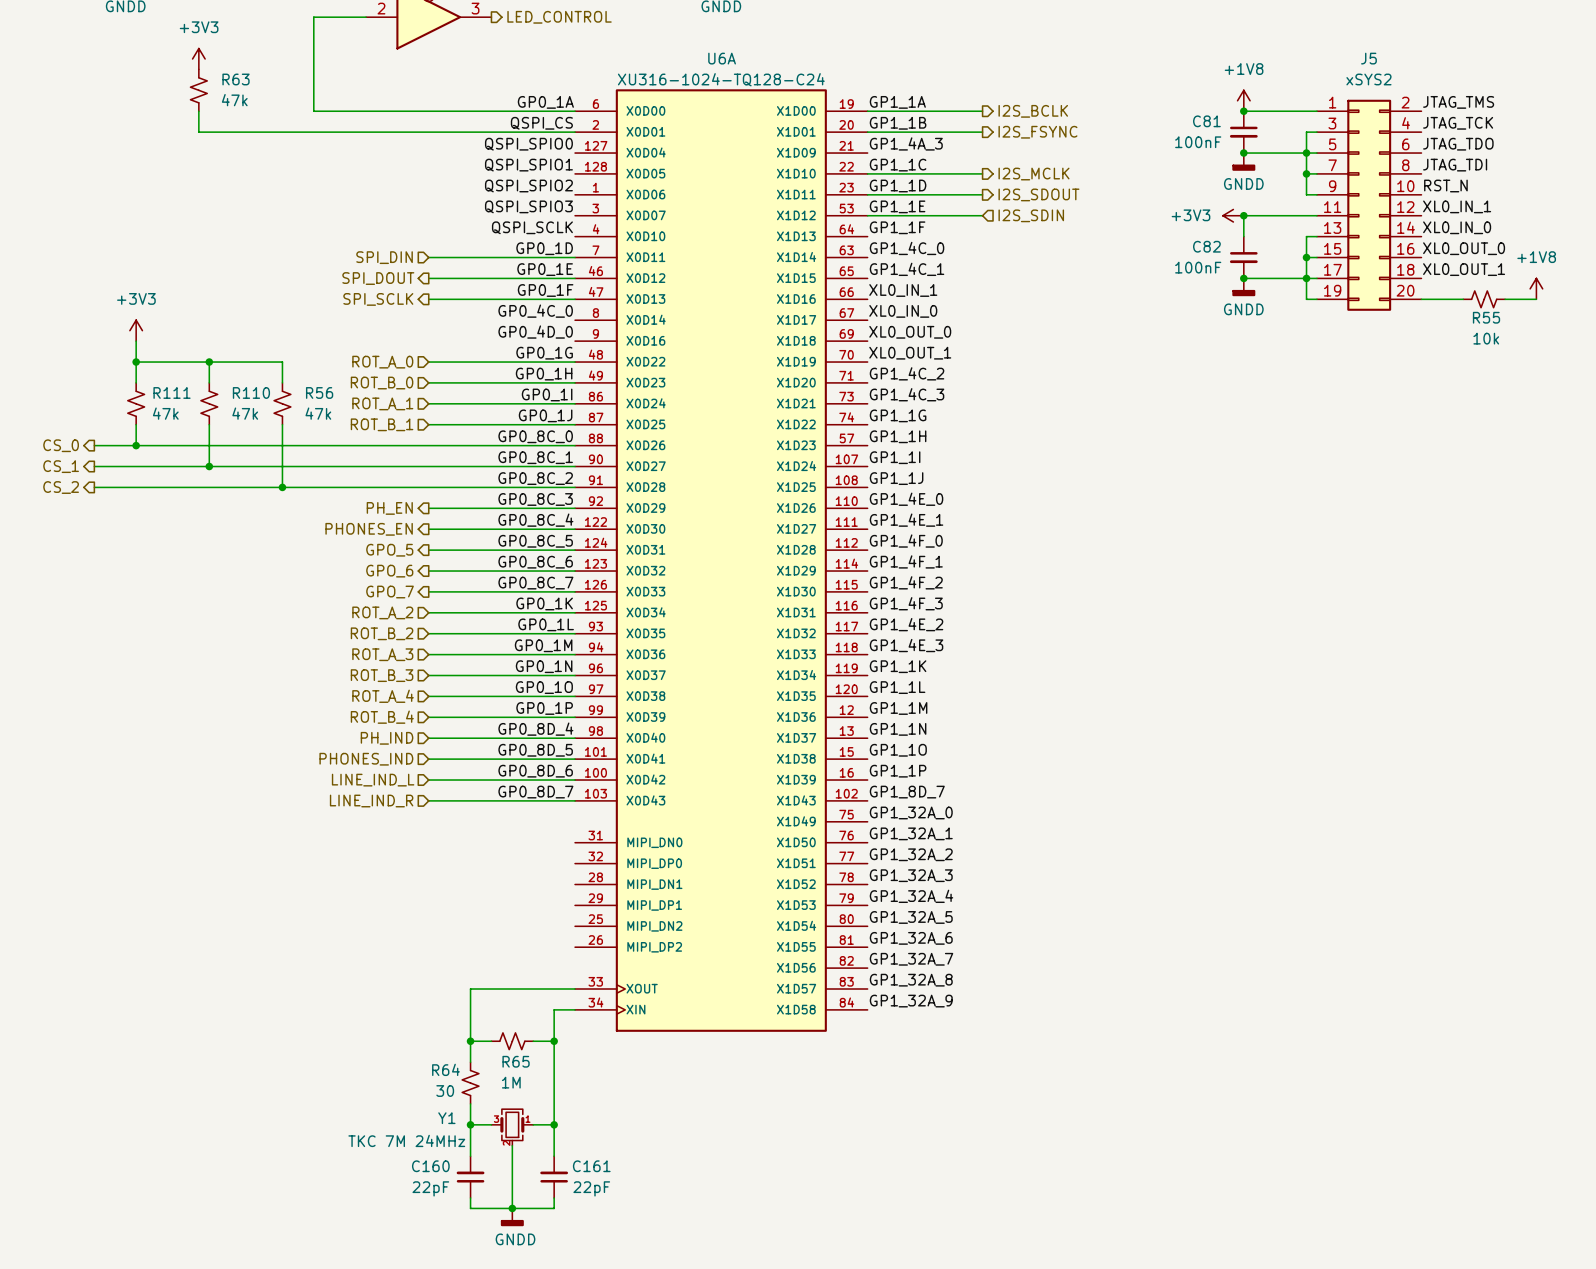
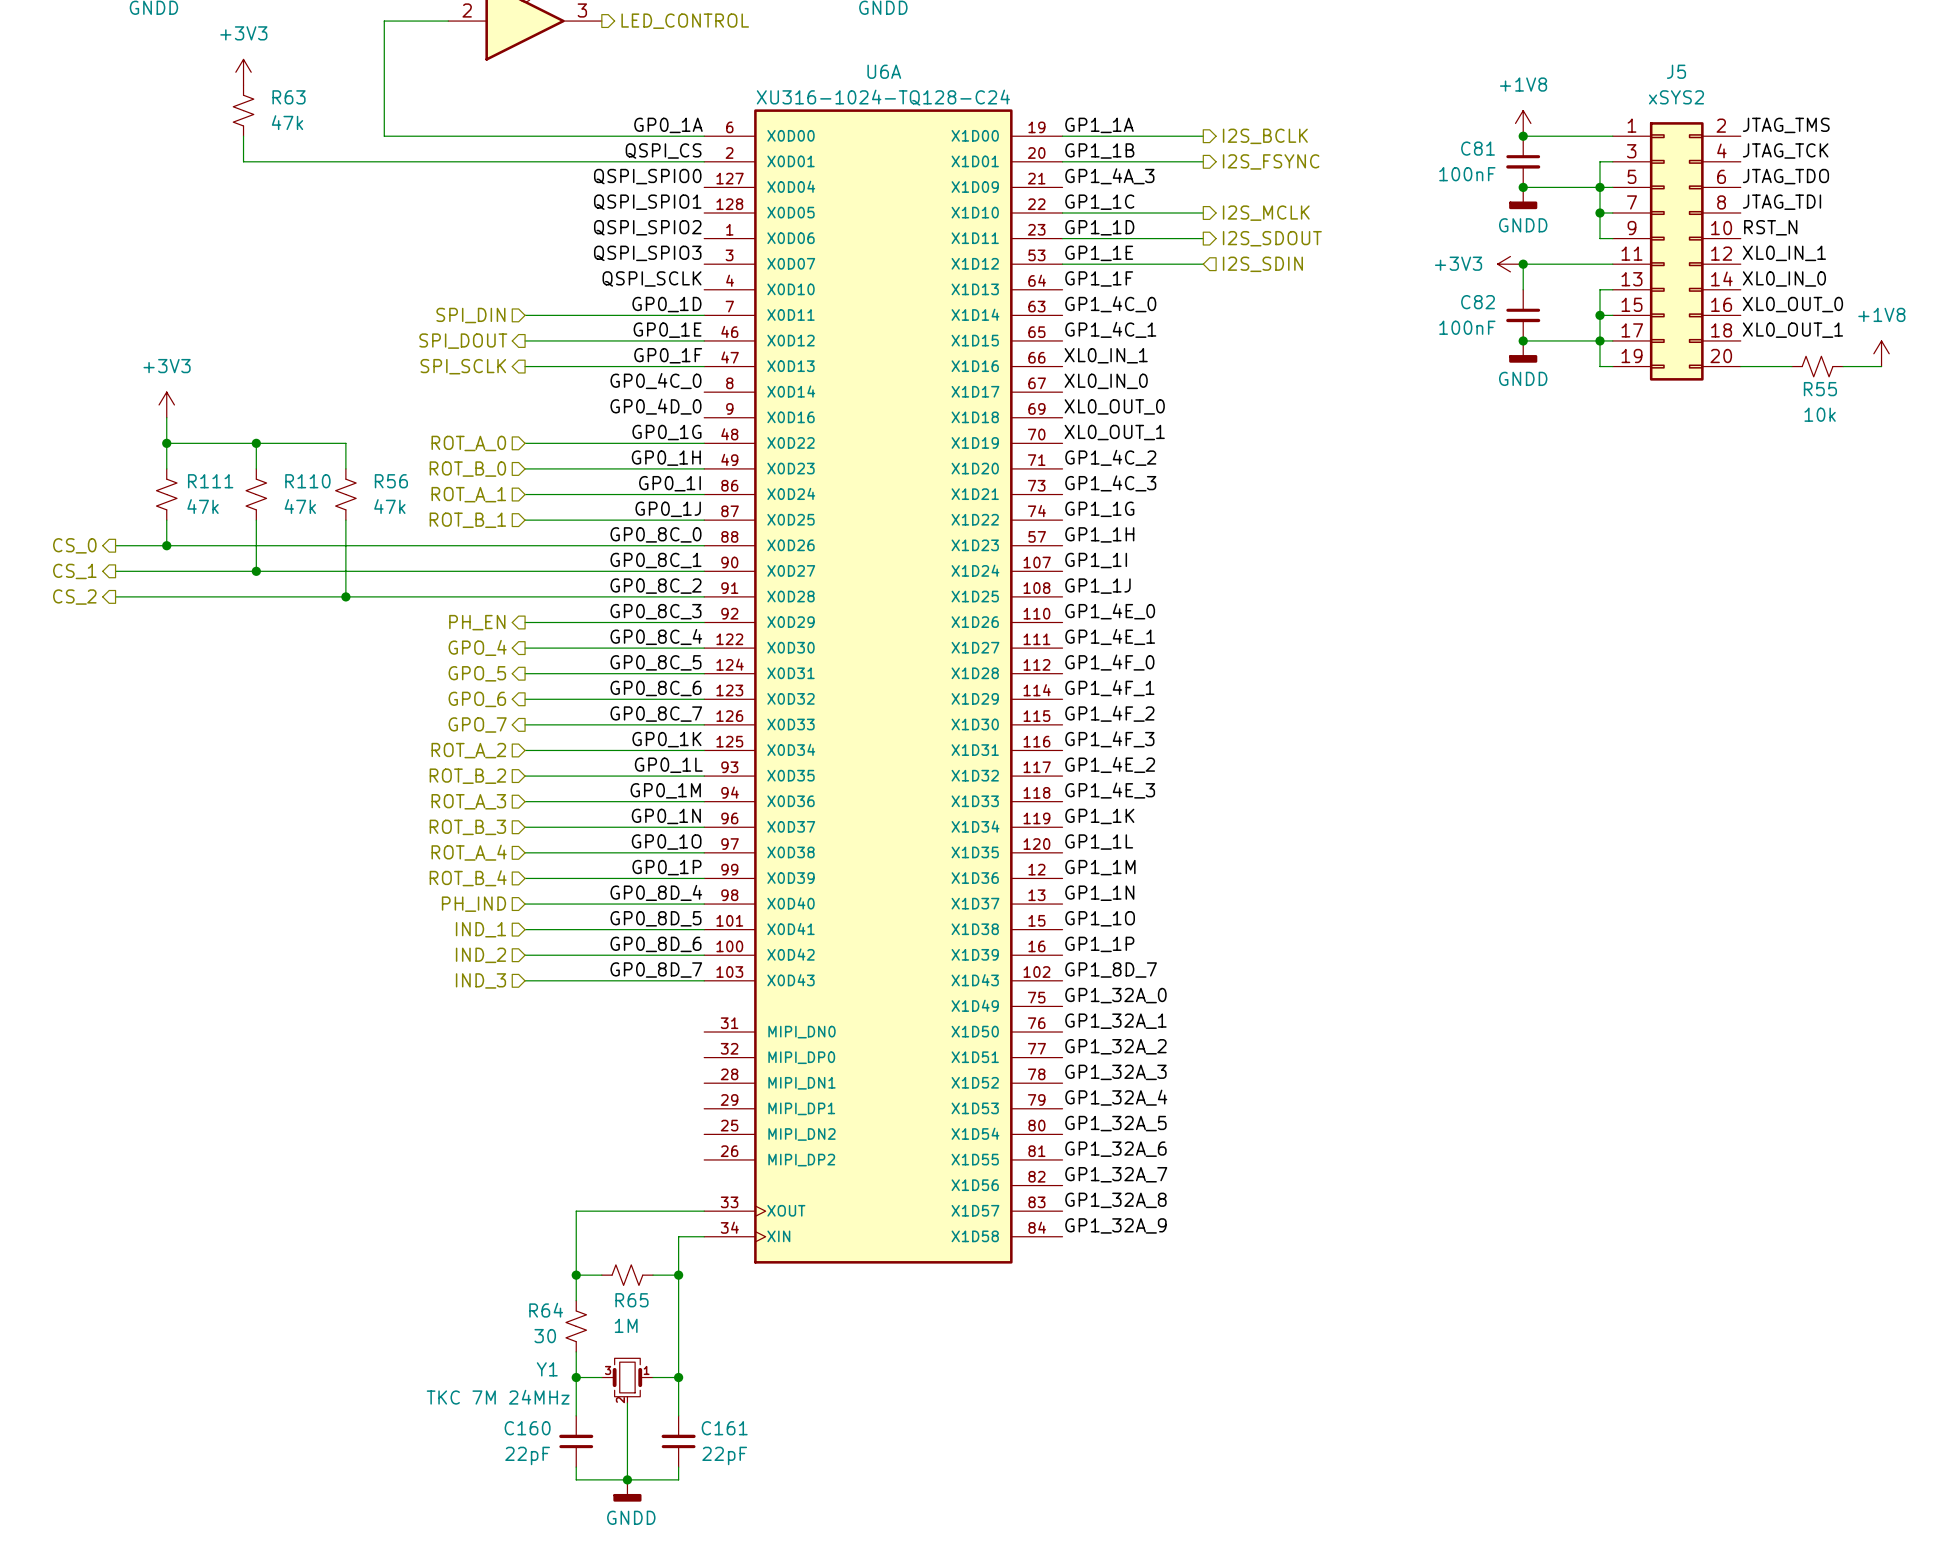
hierarchical label: PHONES_EN (369, 529) -> GPO_4 (477, 647)
hierarchical label: PHONES_IND (366, 759) -> IND_1 (480, 929)
hierarchical label: LINE_IND_L (373, 780) -> IND_2 (480, 955)
hierarchical label: LINE_IND_R (371, 801) -> IND_3 (480, 980)

